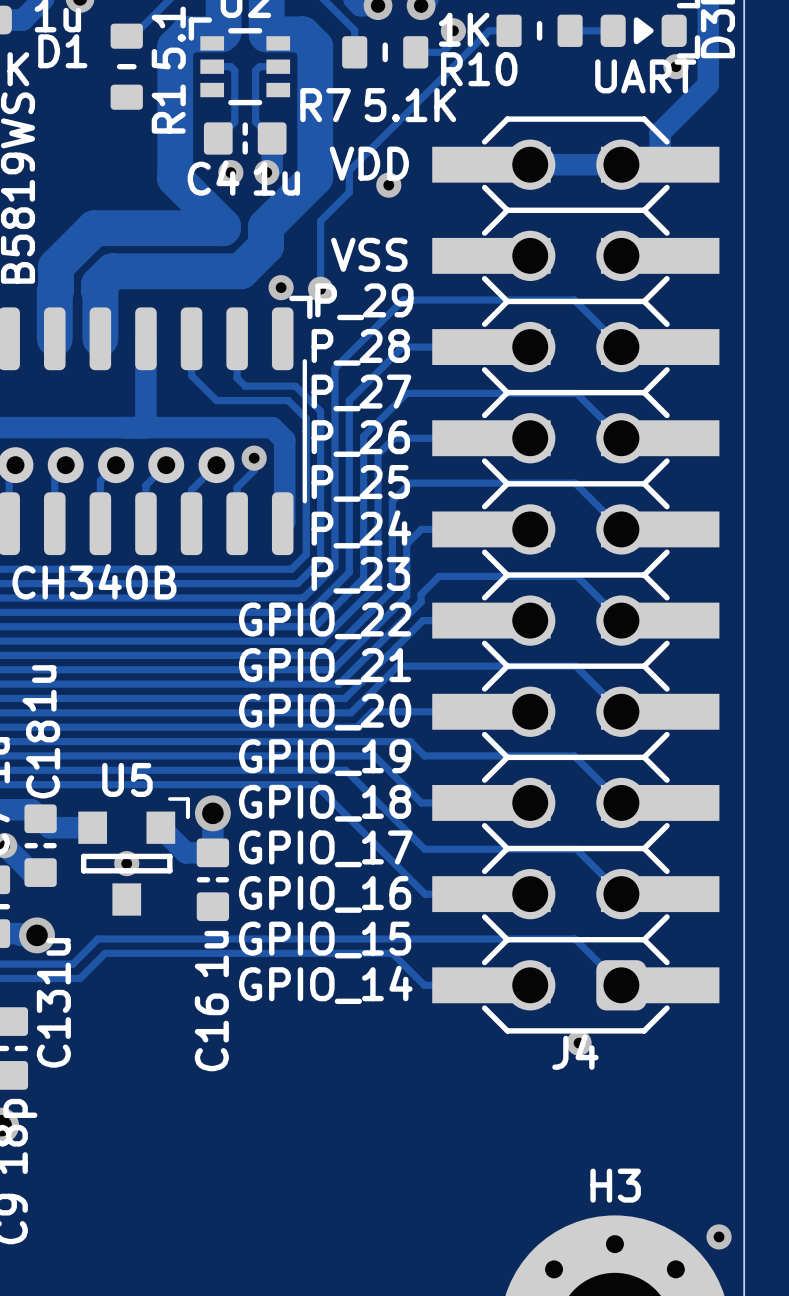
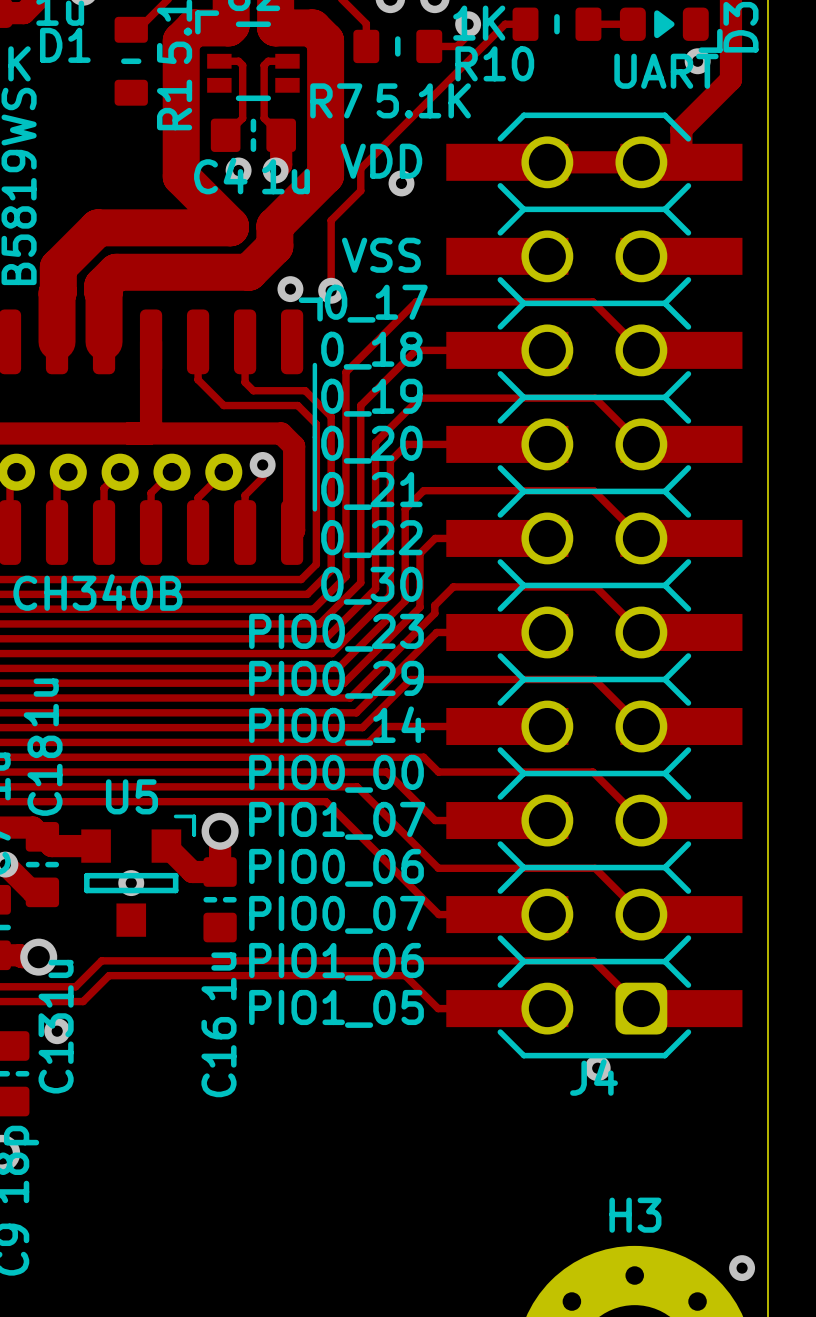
J4 footprint: [432, 116, 720, 1034] -> [446, 112, 743, 1059]
via: none -> (57, 1031)

